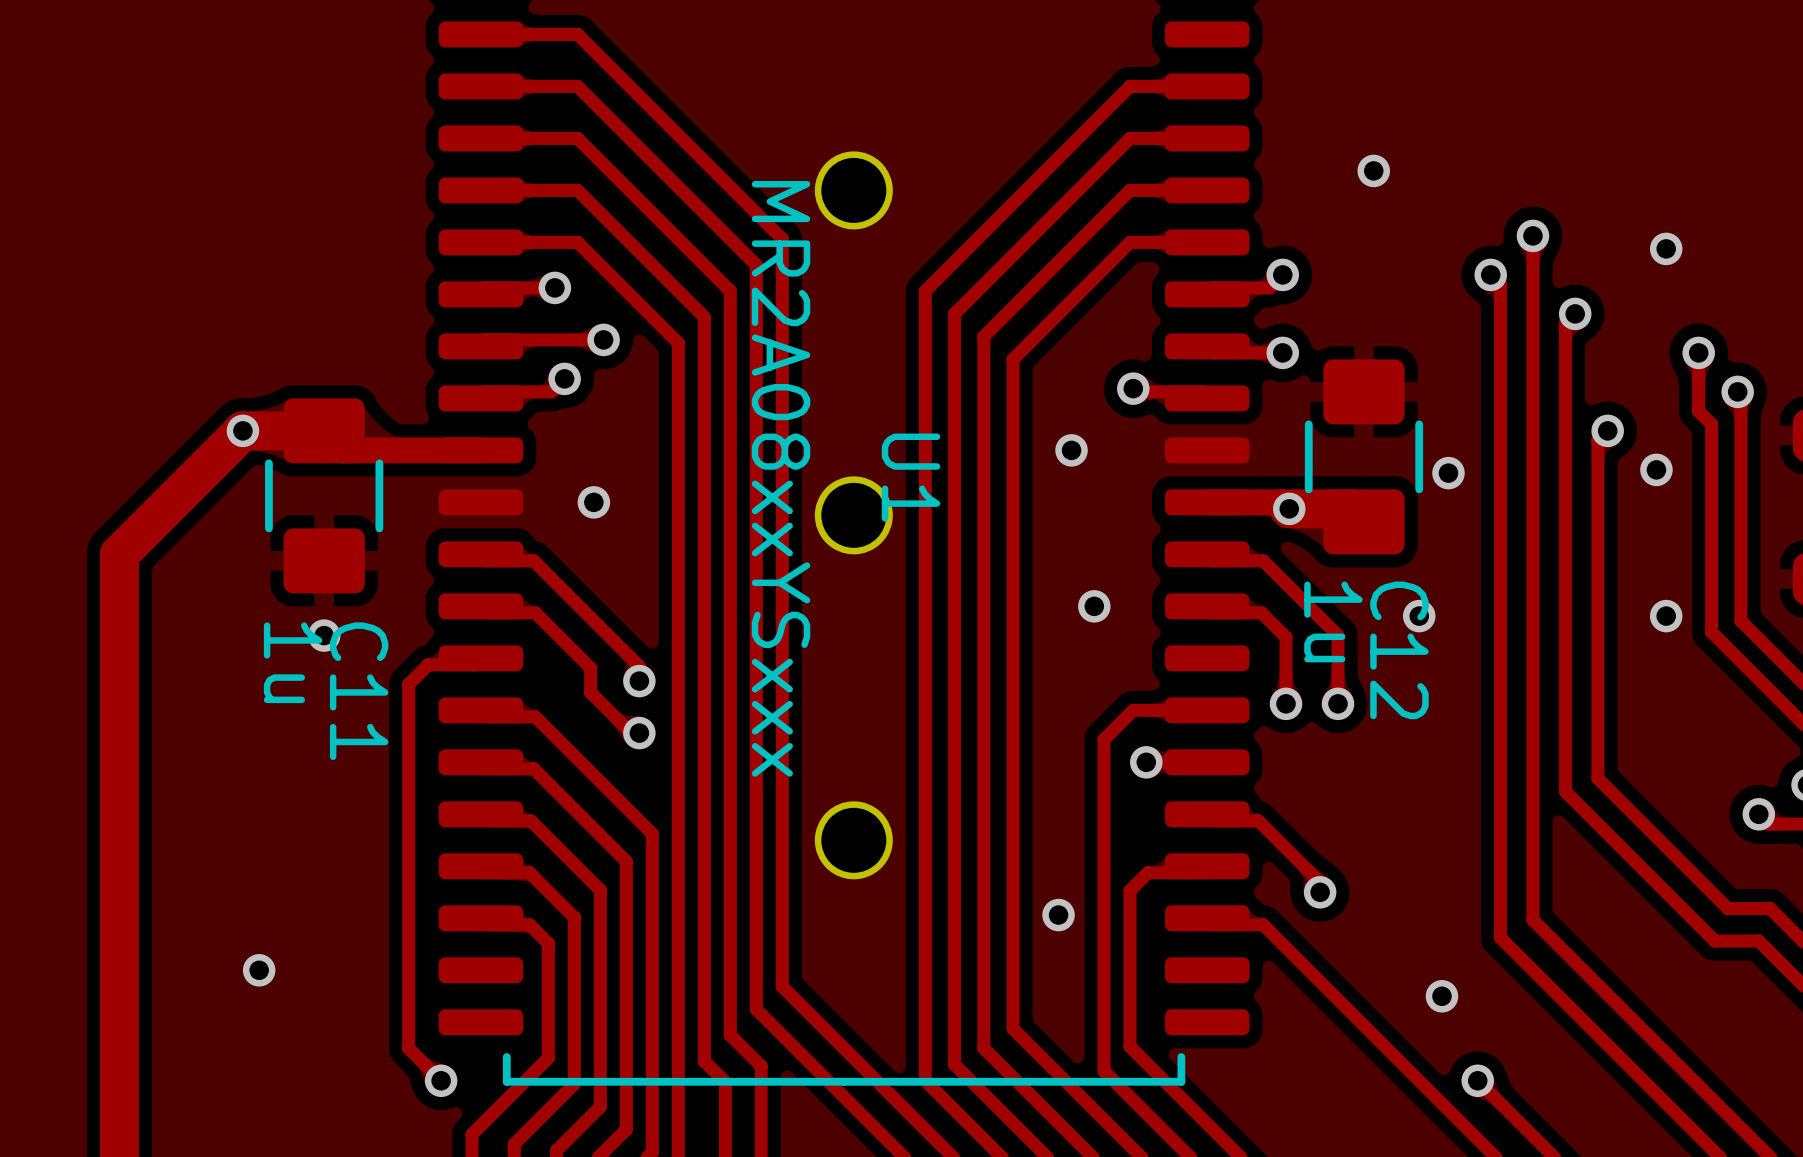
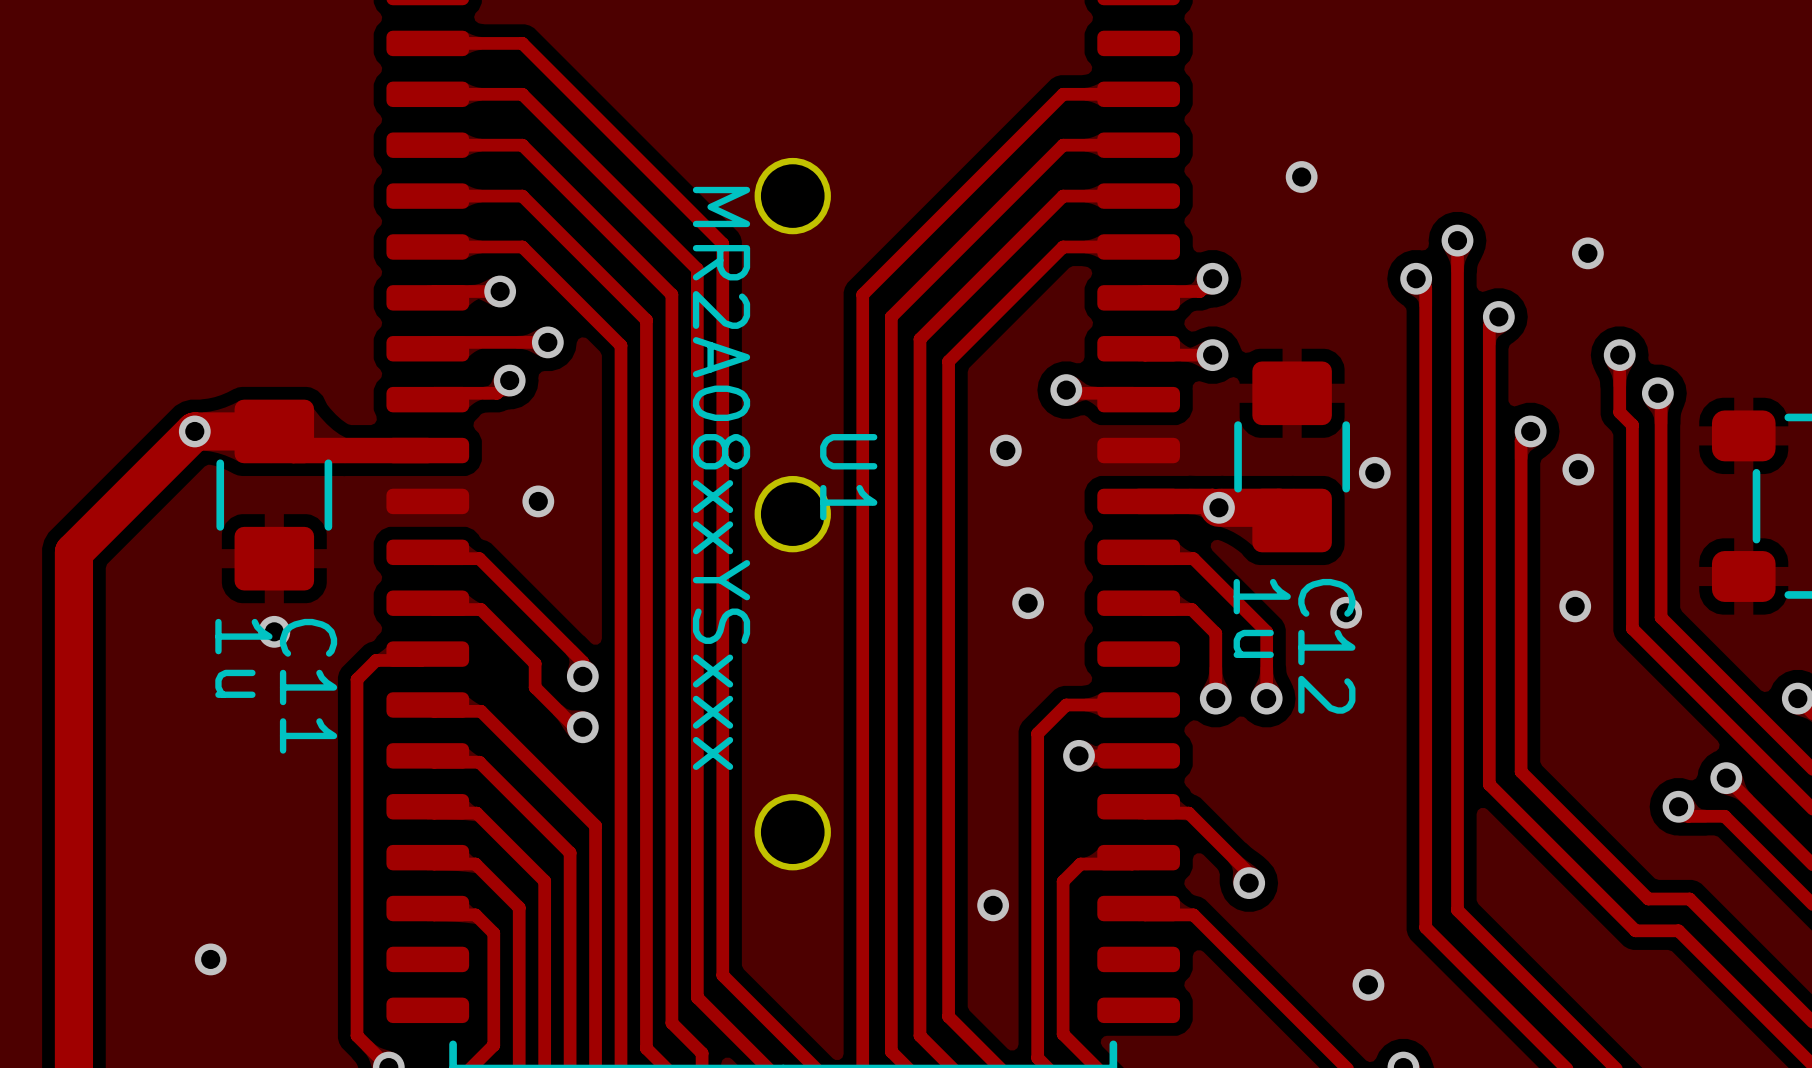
via position: (1666, 616) -> (1575, 606)

